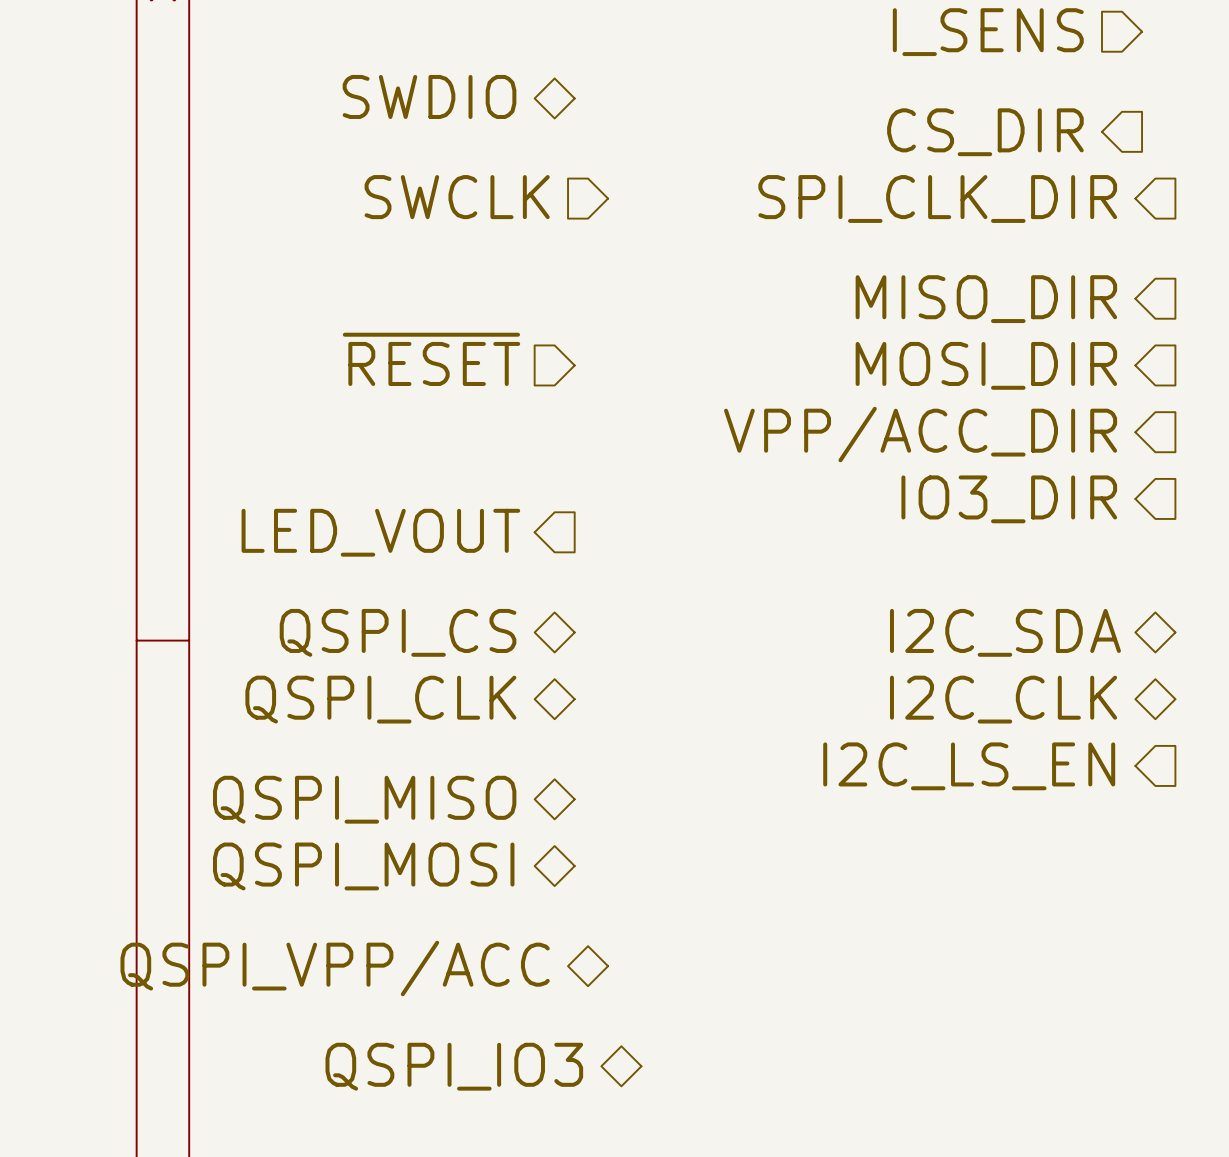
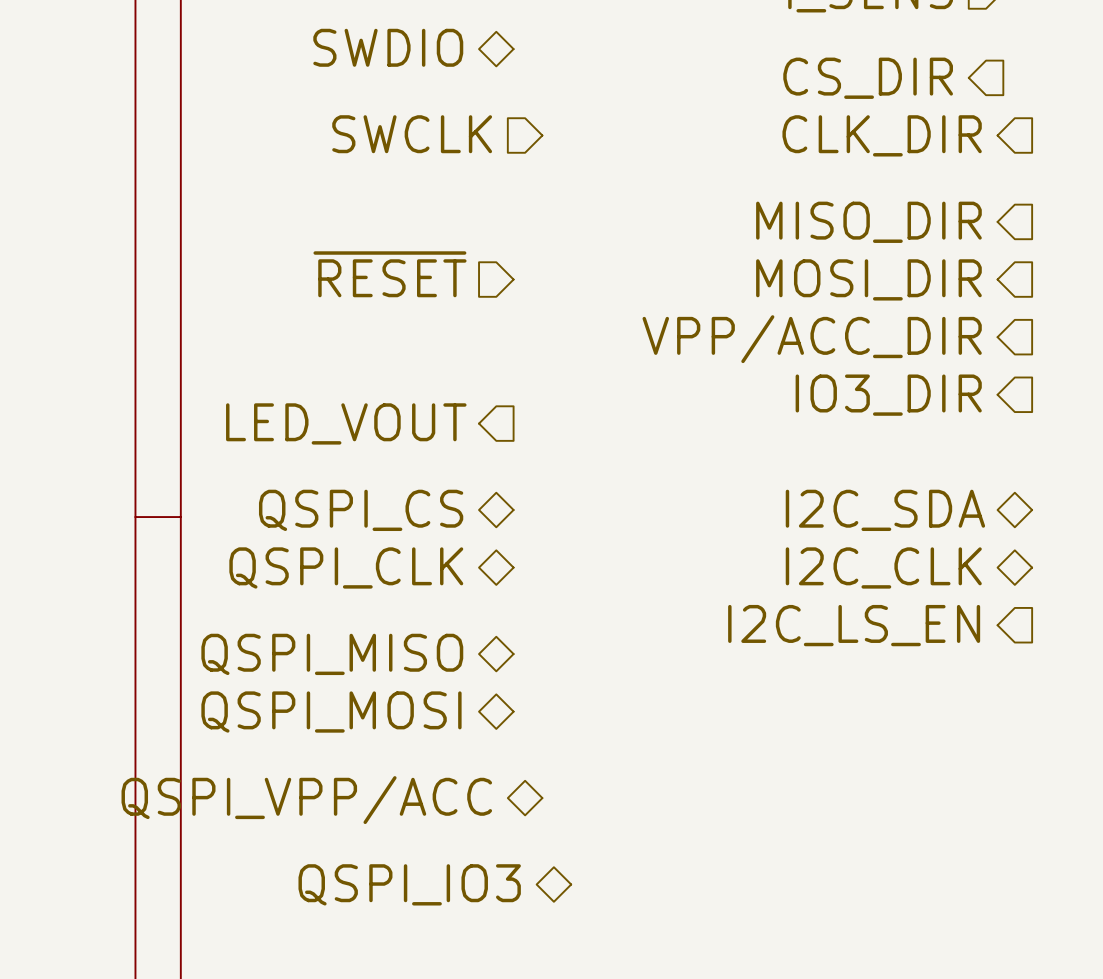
hierarchical label: SPI_CLK_DIR (937, 199) -> CLK_DIR (882, 135)

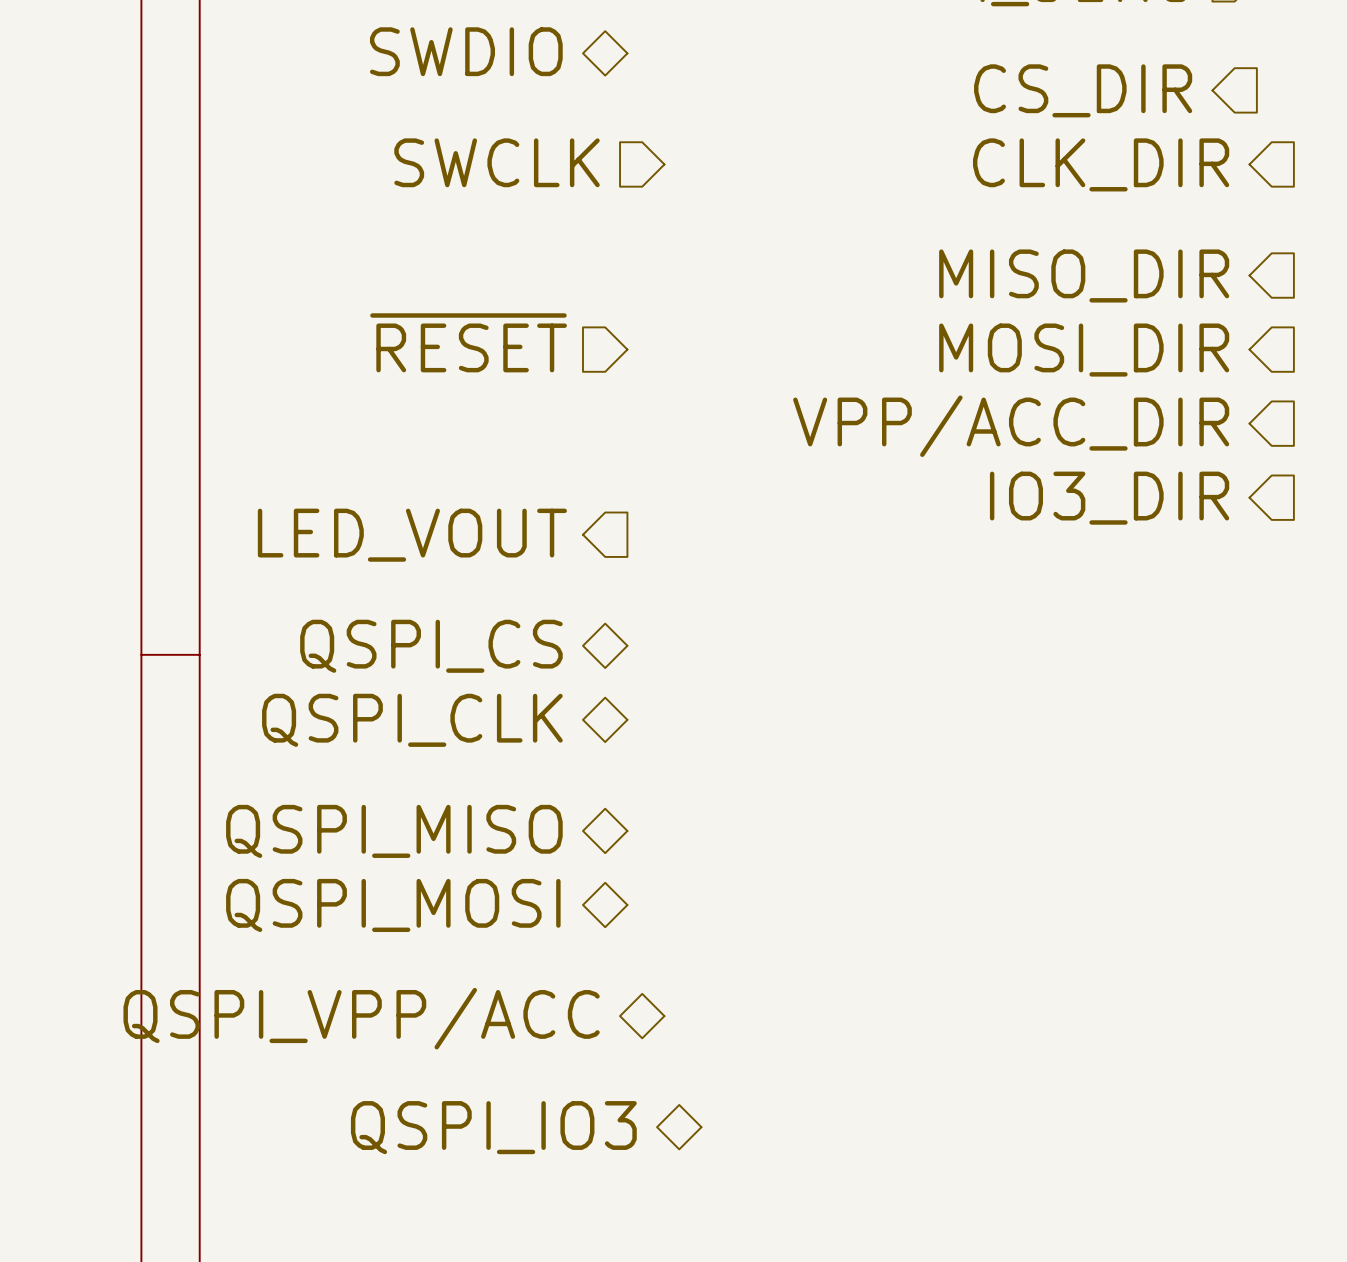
hierarchical label: I2C_SDA (885, 510) -> none
hierarchical label: I2C_CLK (883, 567) -> none
hierarchical label: I2C_LS_EN (854, 625) -> none

